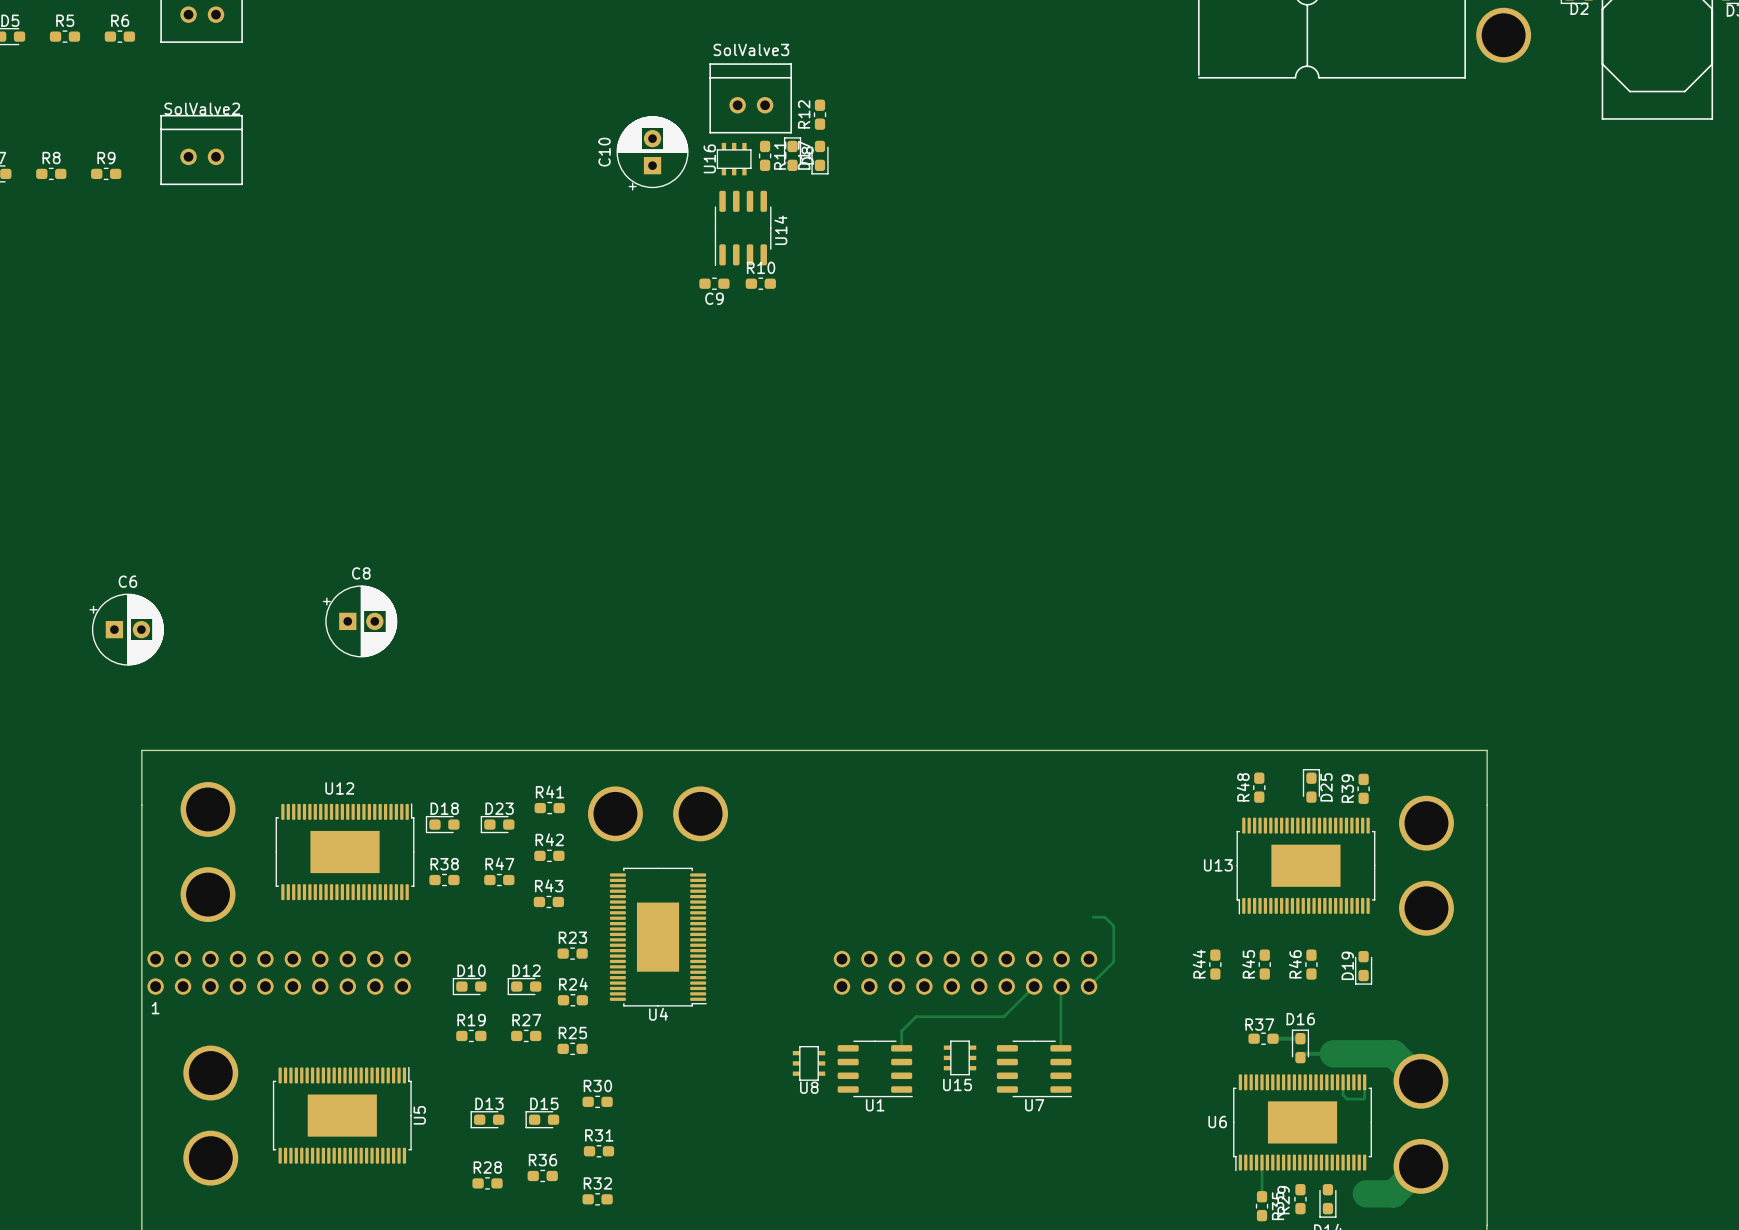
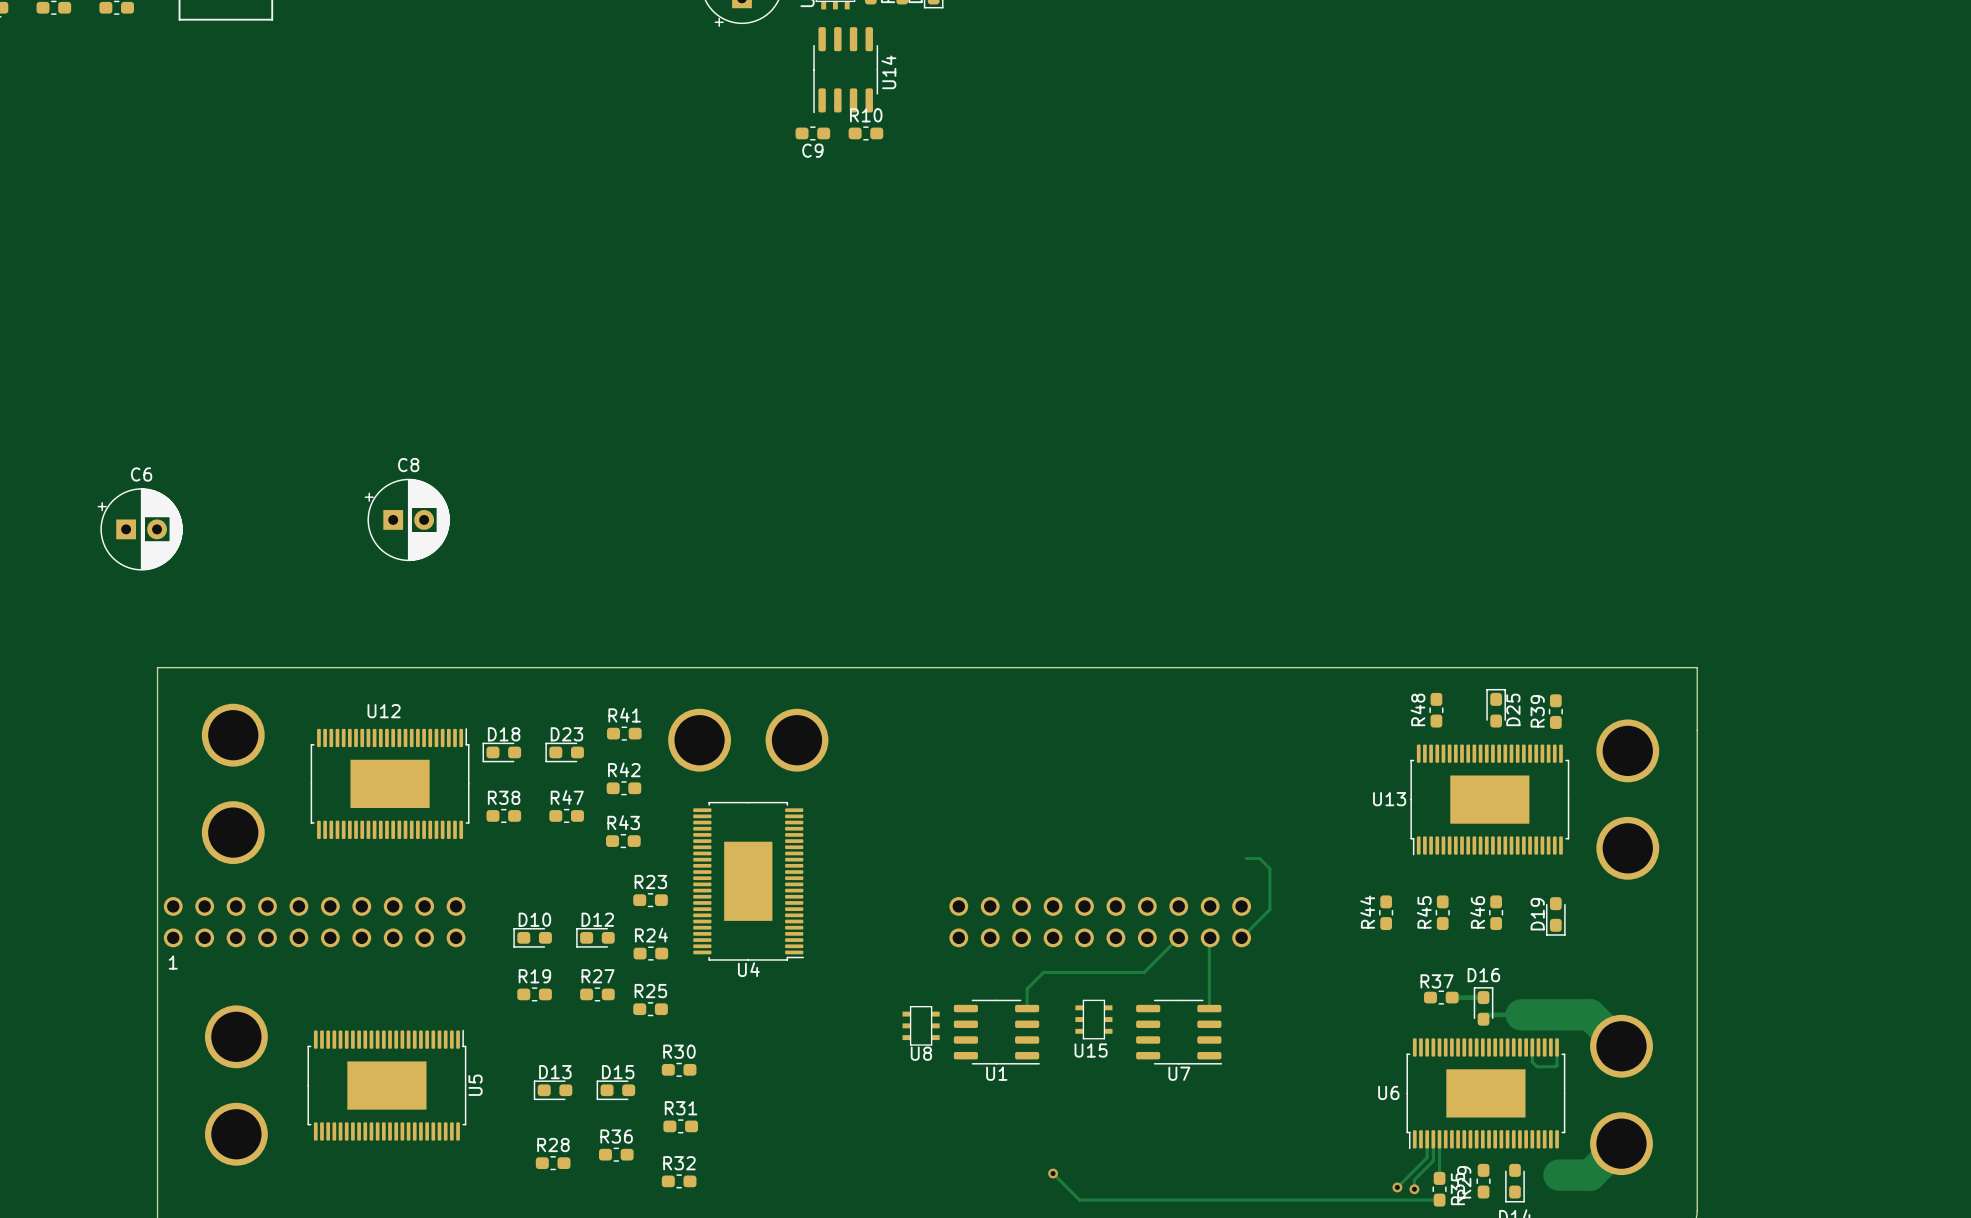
track: none -> (1427, 1139) (1427, 1157) (1397, 1187)
track: none -> (1433, 1139) (1433, 1160) (1414, 1179) (1414, 1189)
track: none -> (1053, 1173) (1079, 1200) (1439, 1200)
via: none -> (1053, 1173)
via: none -> (1397, 1187)
via: none -> (1414, 1189)

